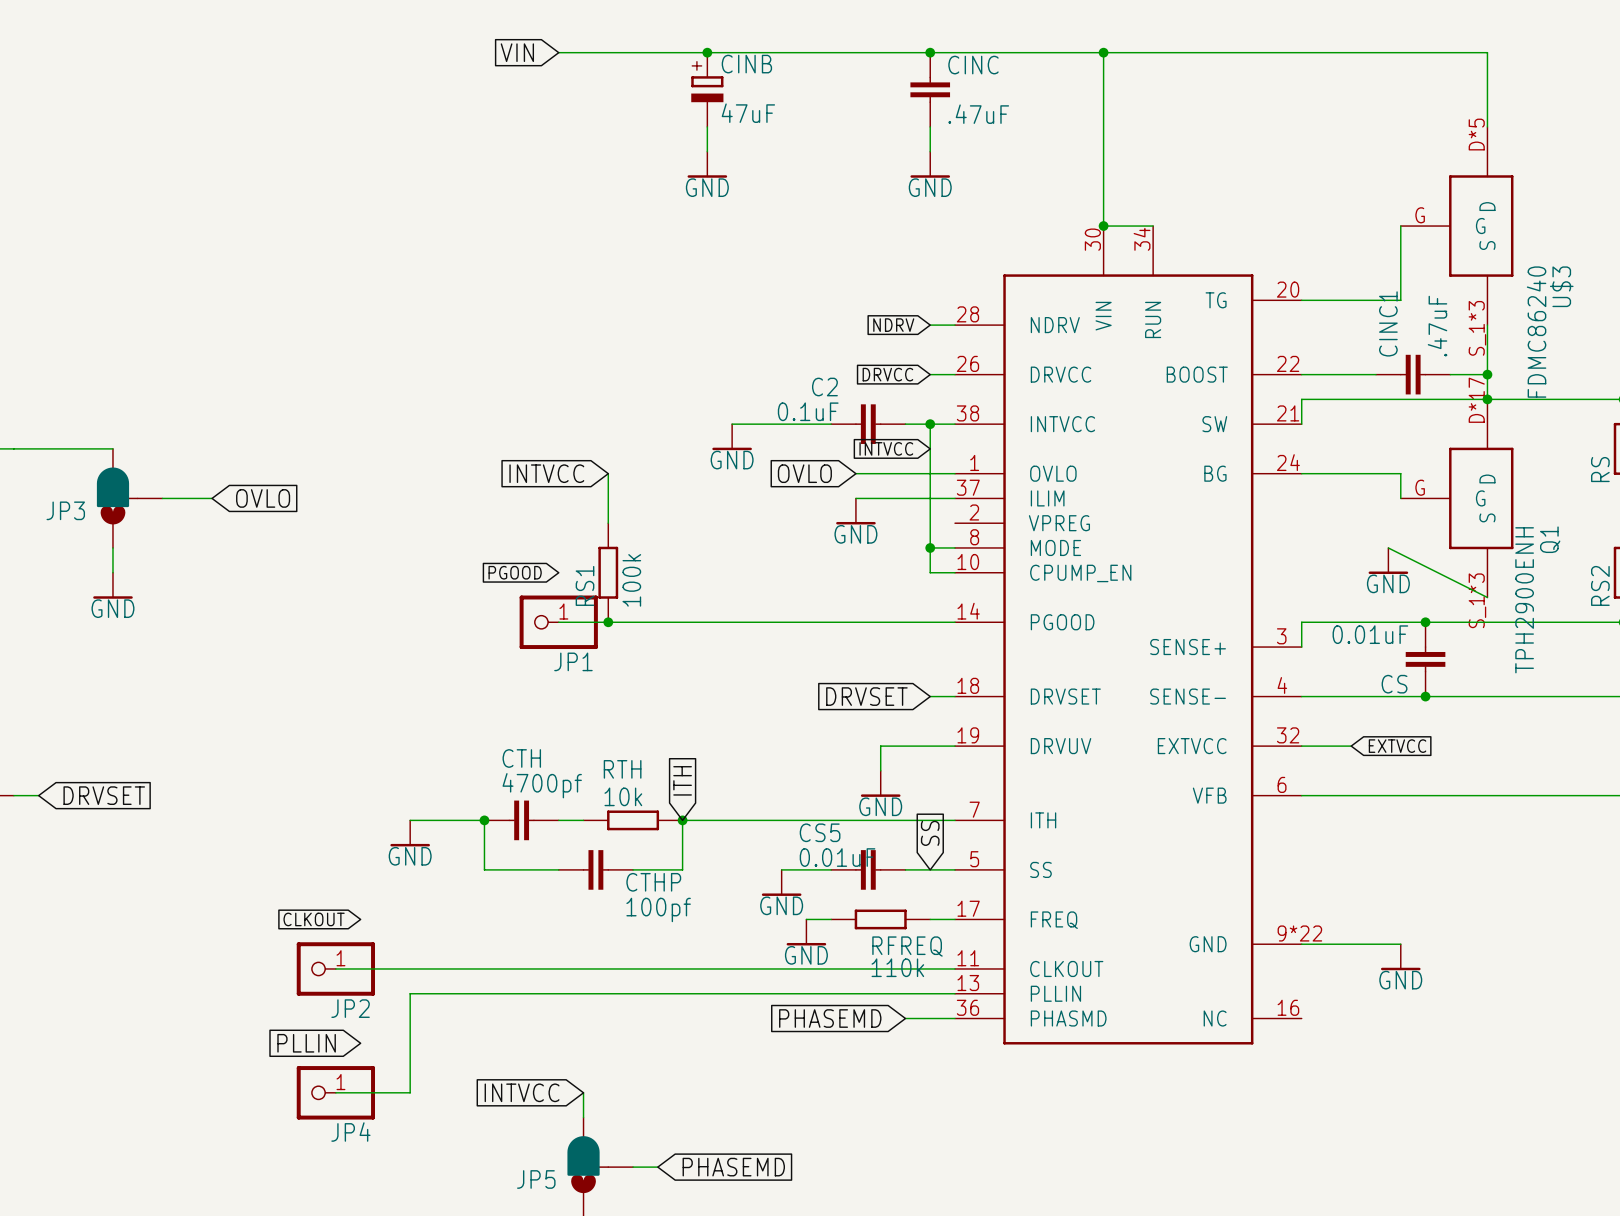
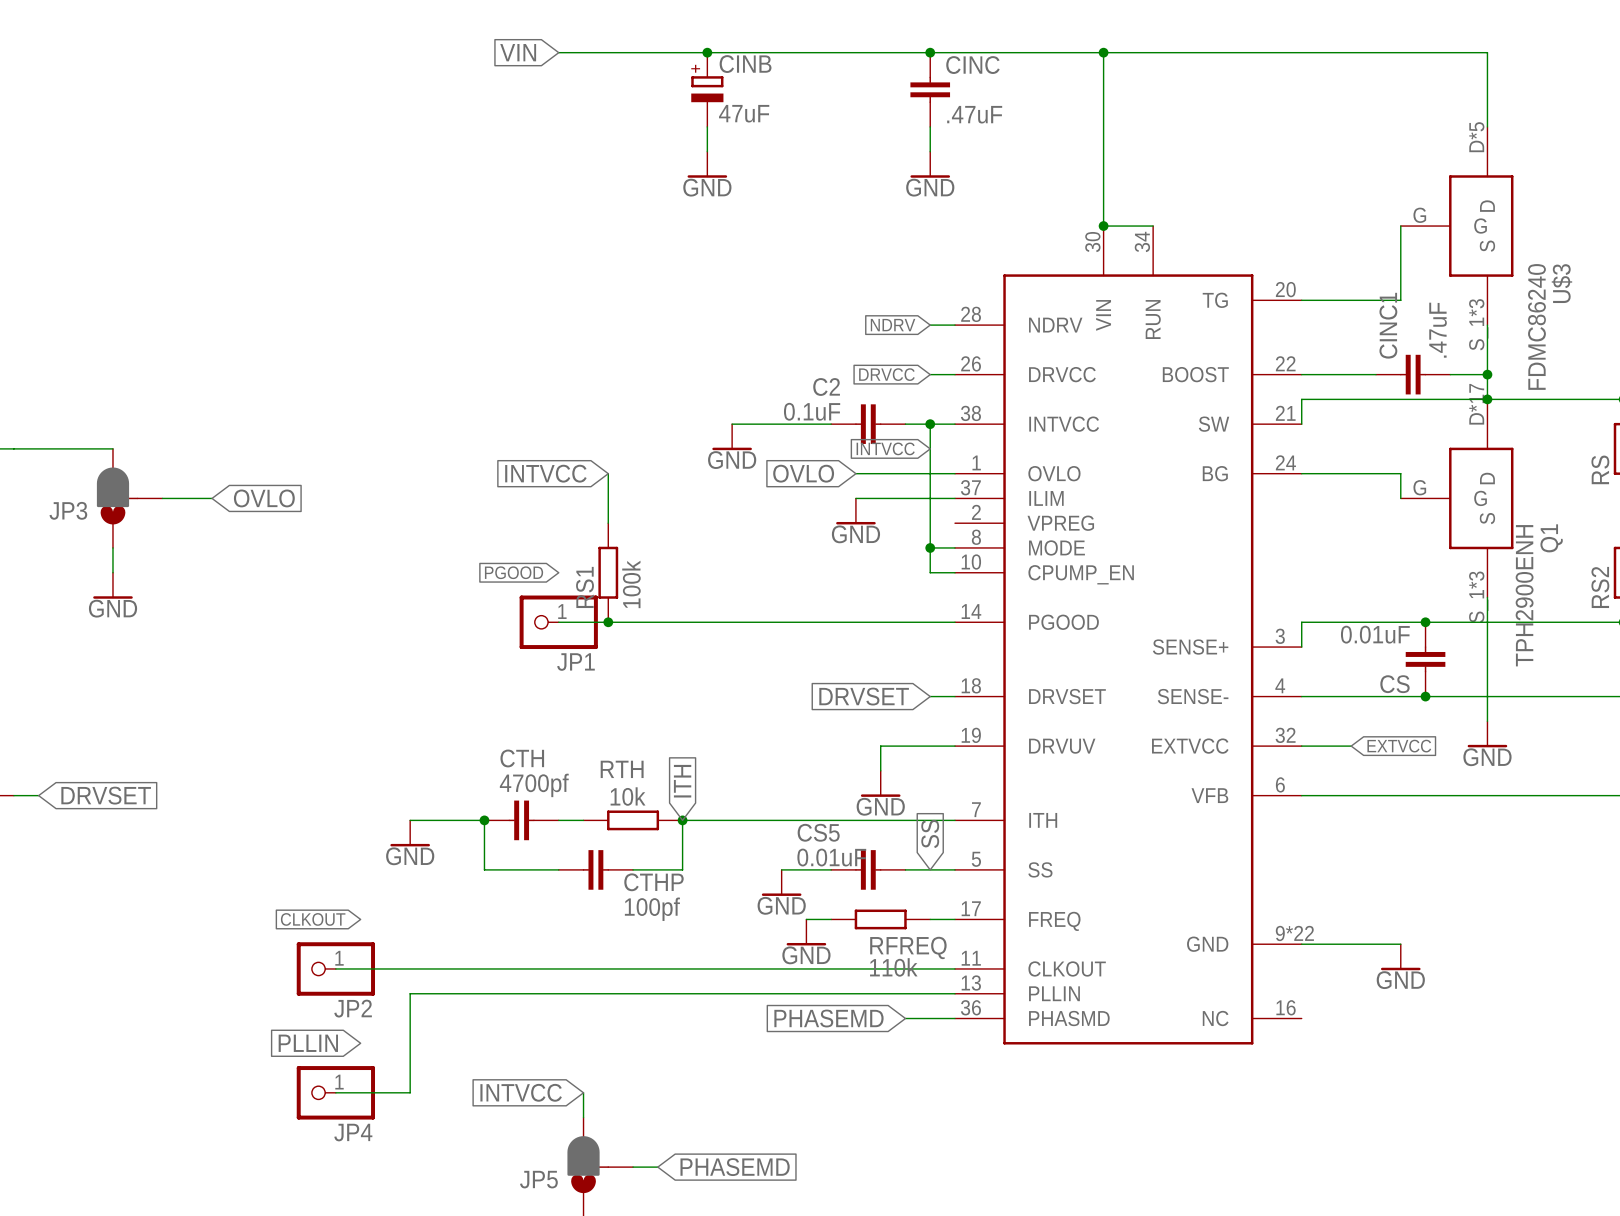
wire: (1388, 547) (1487, 597) -> (1487, 721) (1487, 597)
power symbol position: GND (1388, 560) -> GND (1487, 734)

